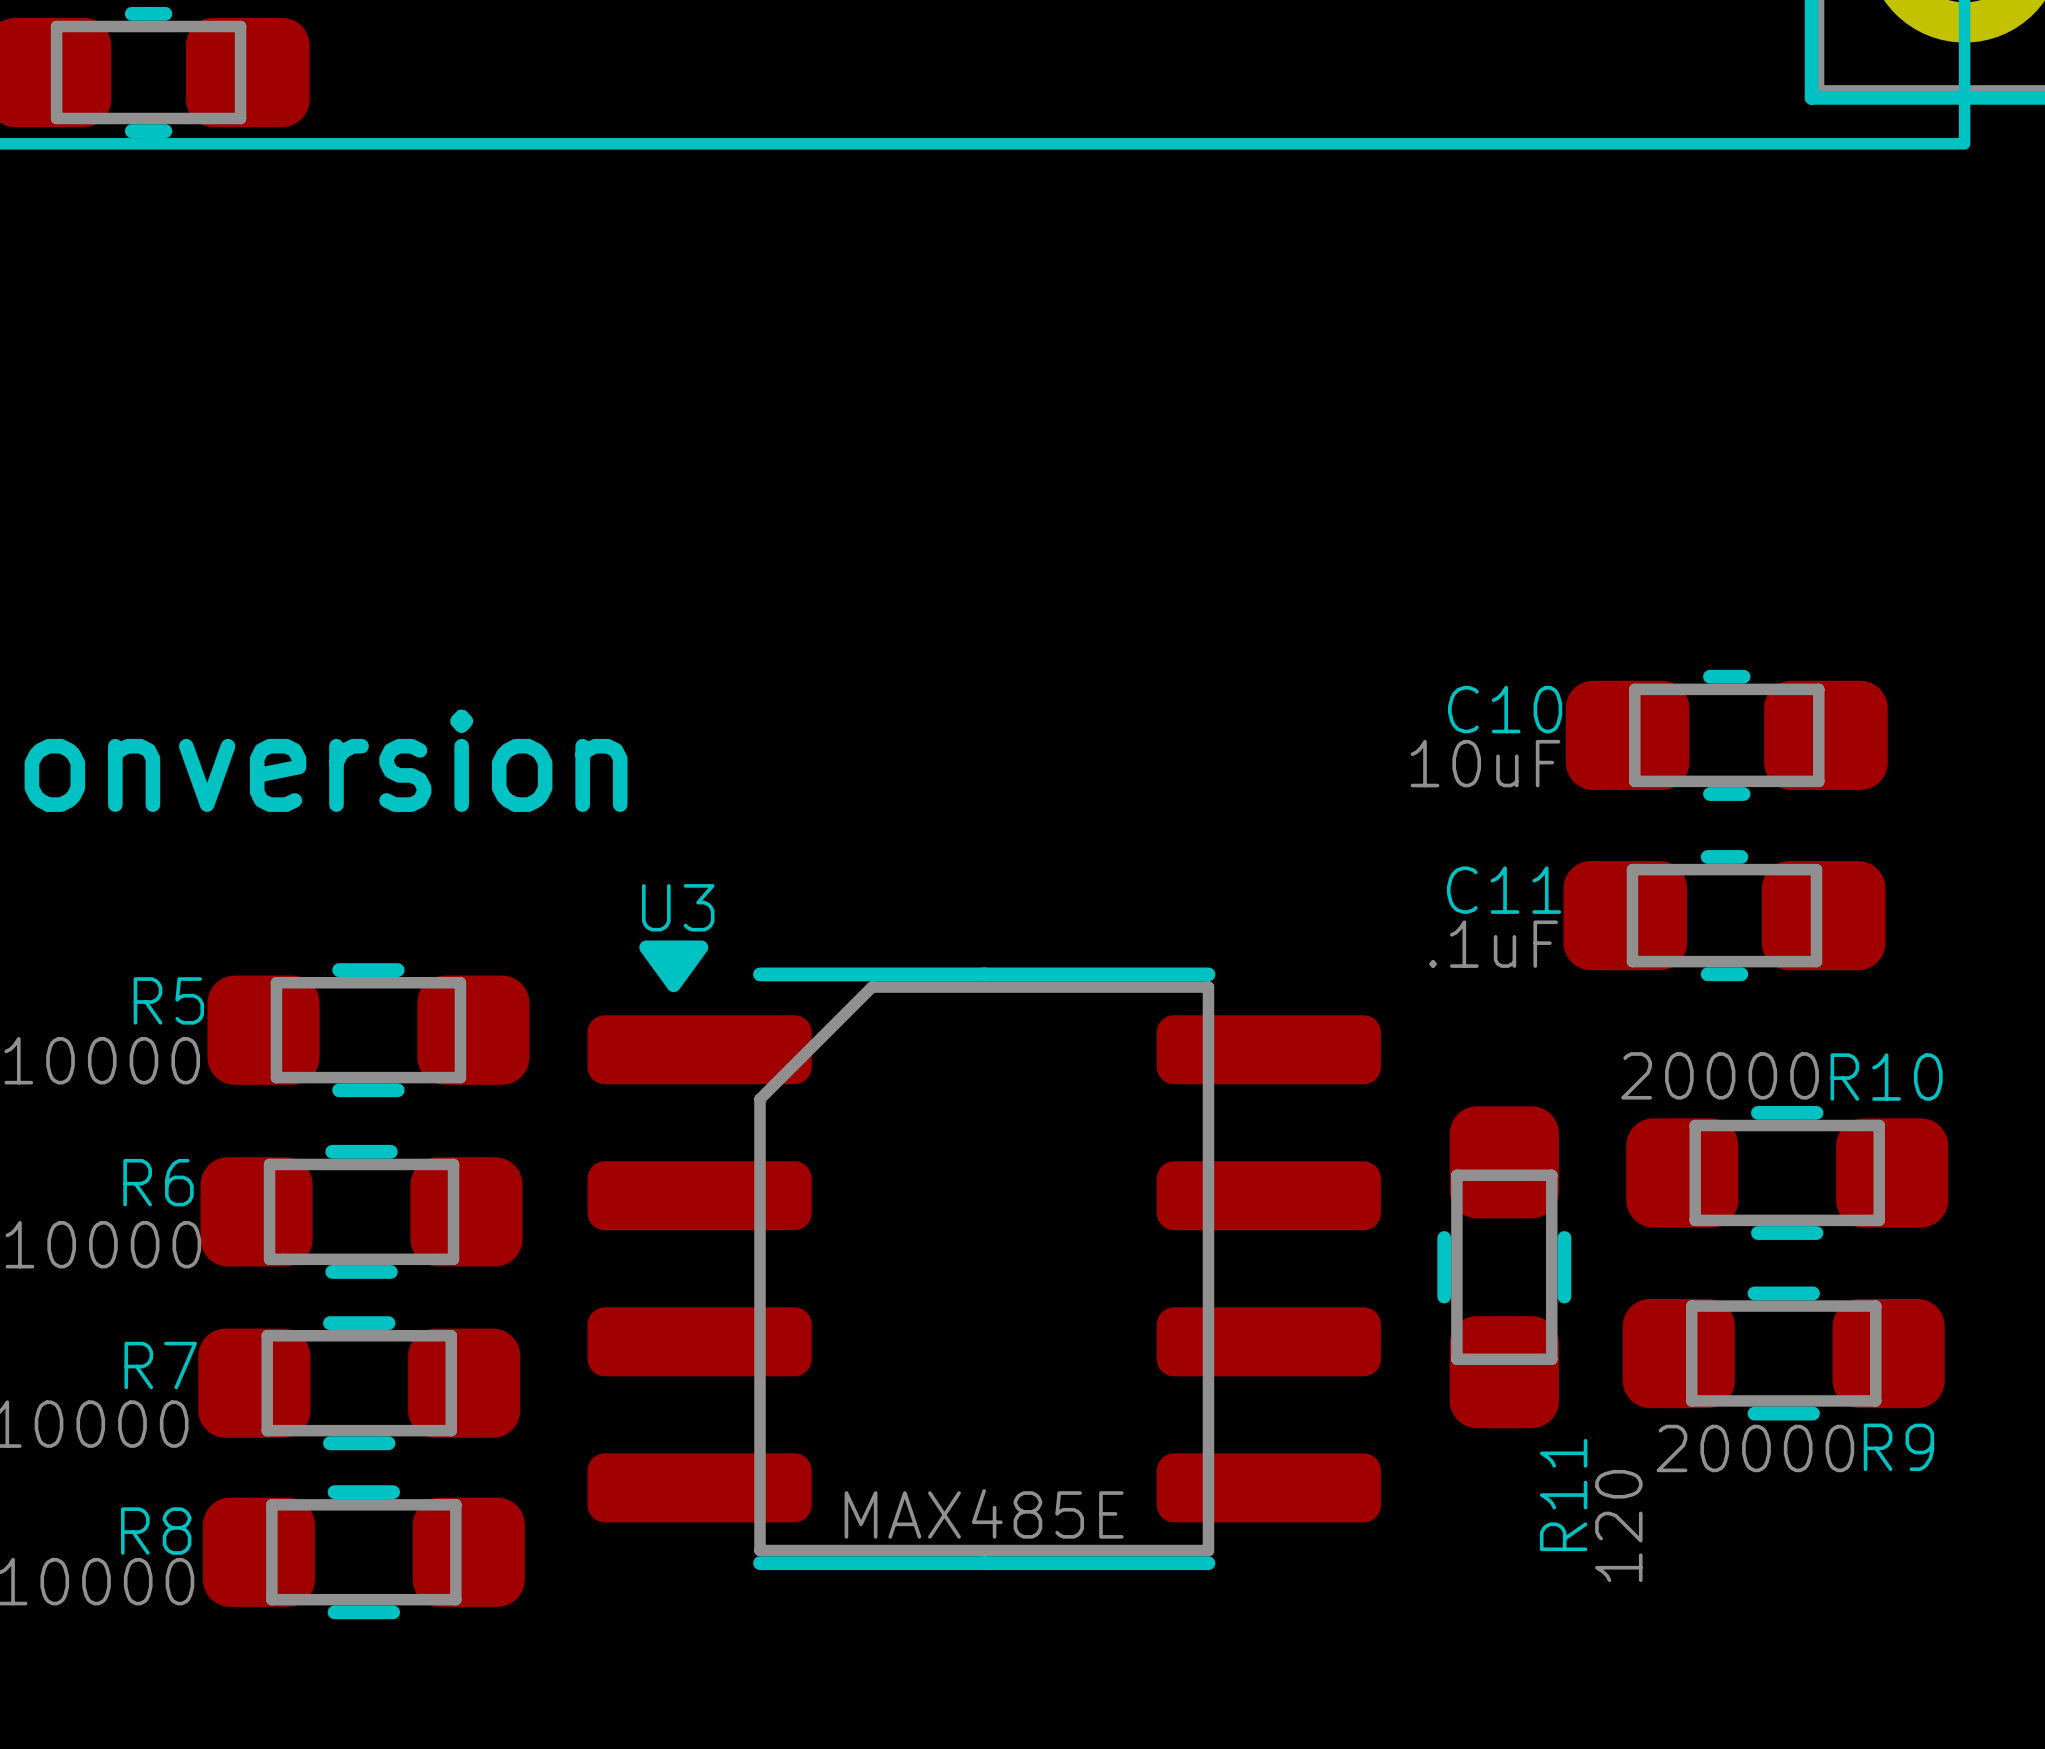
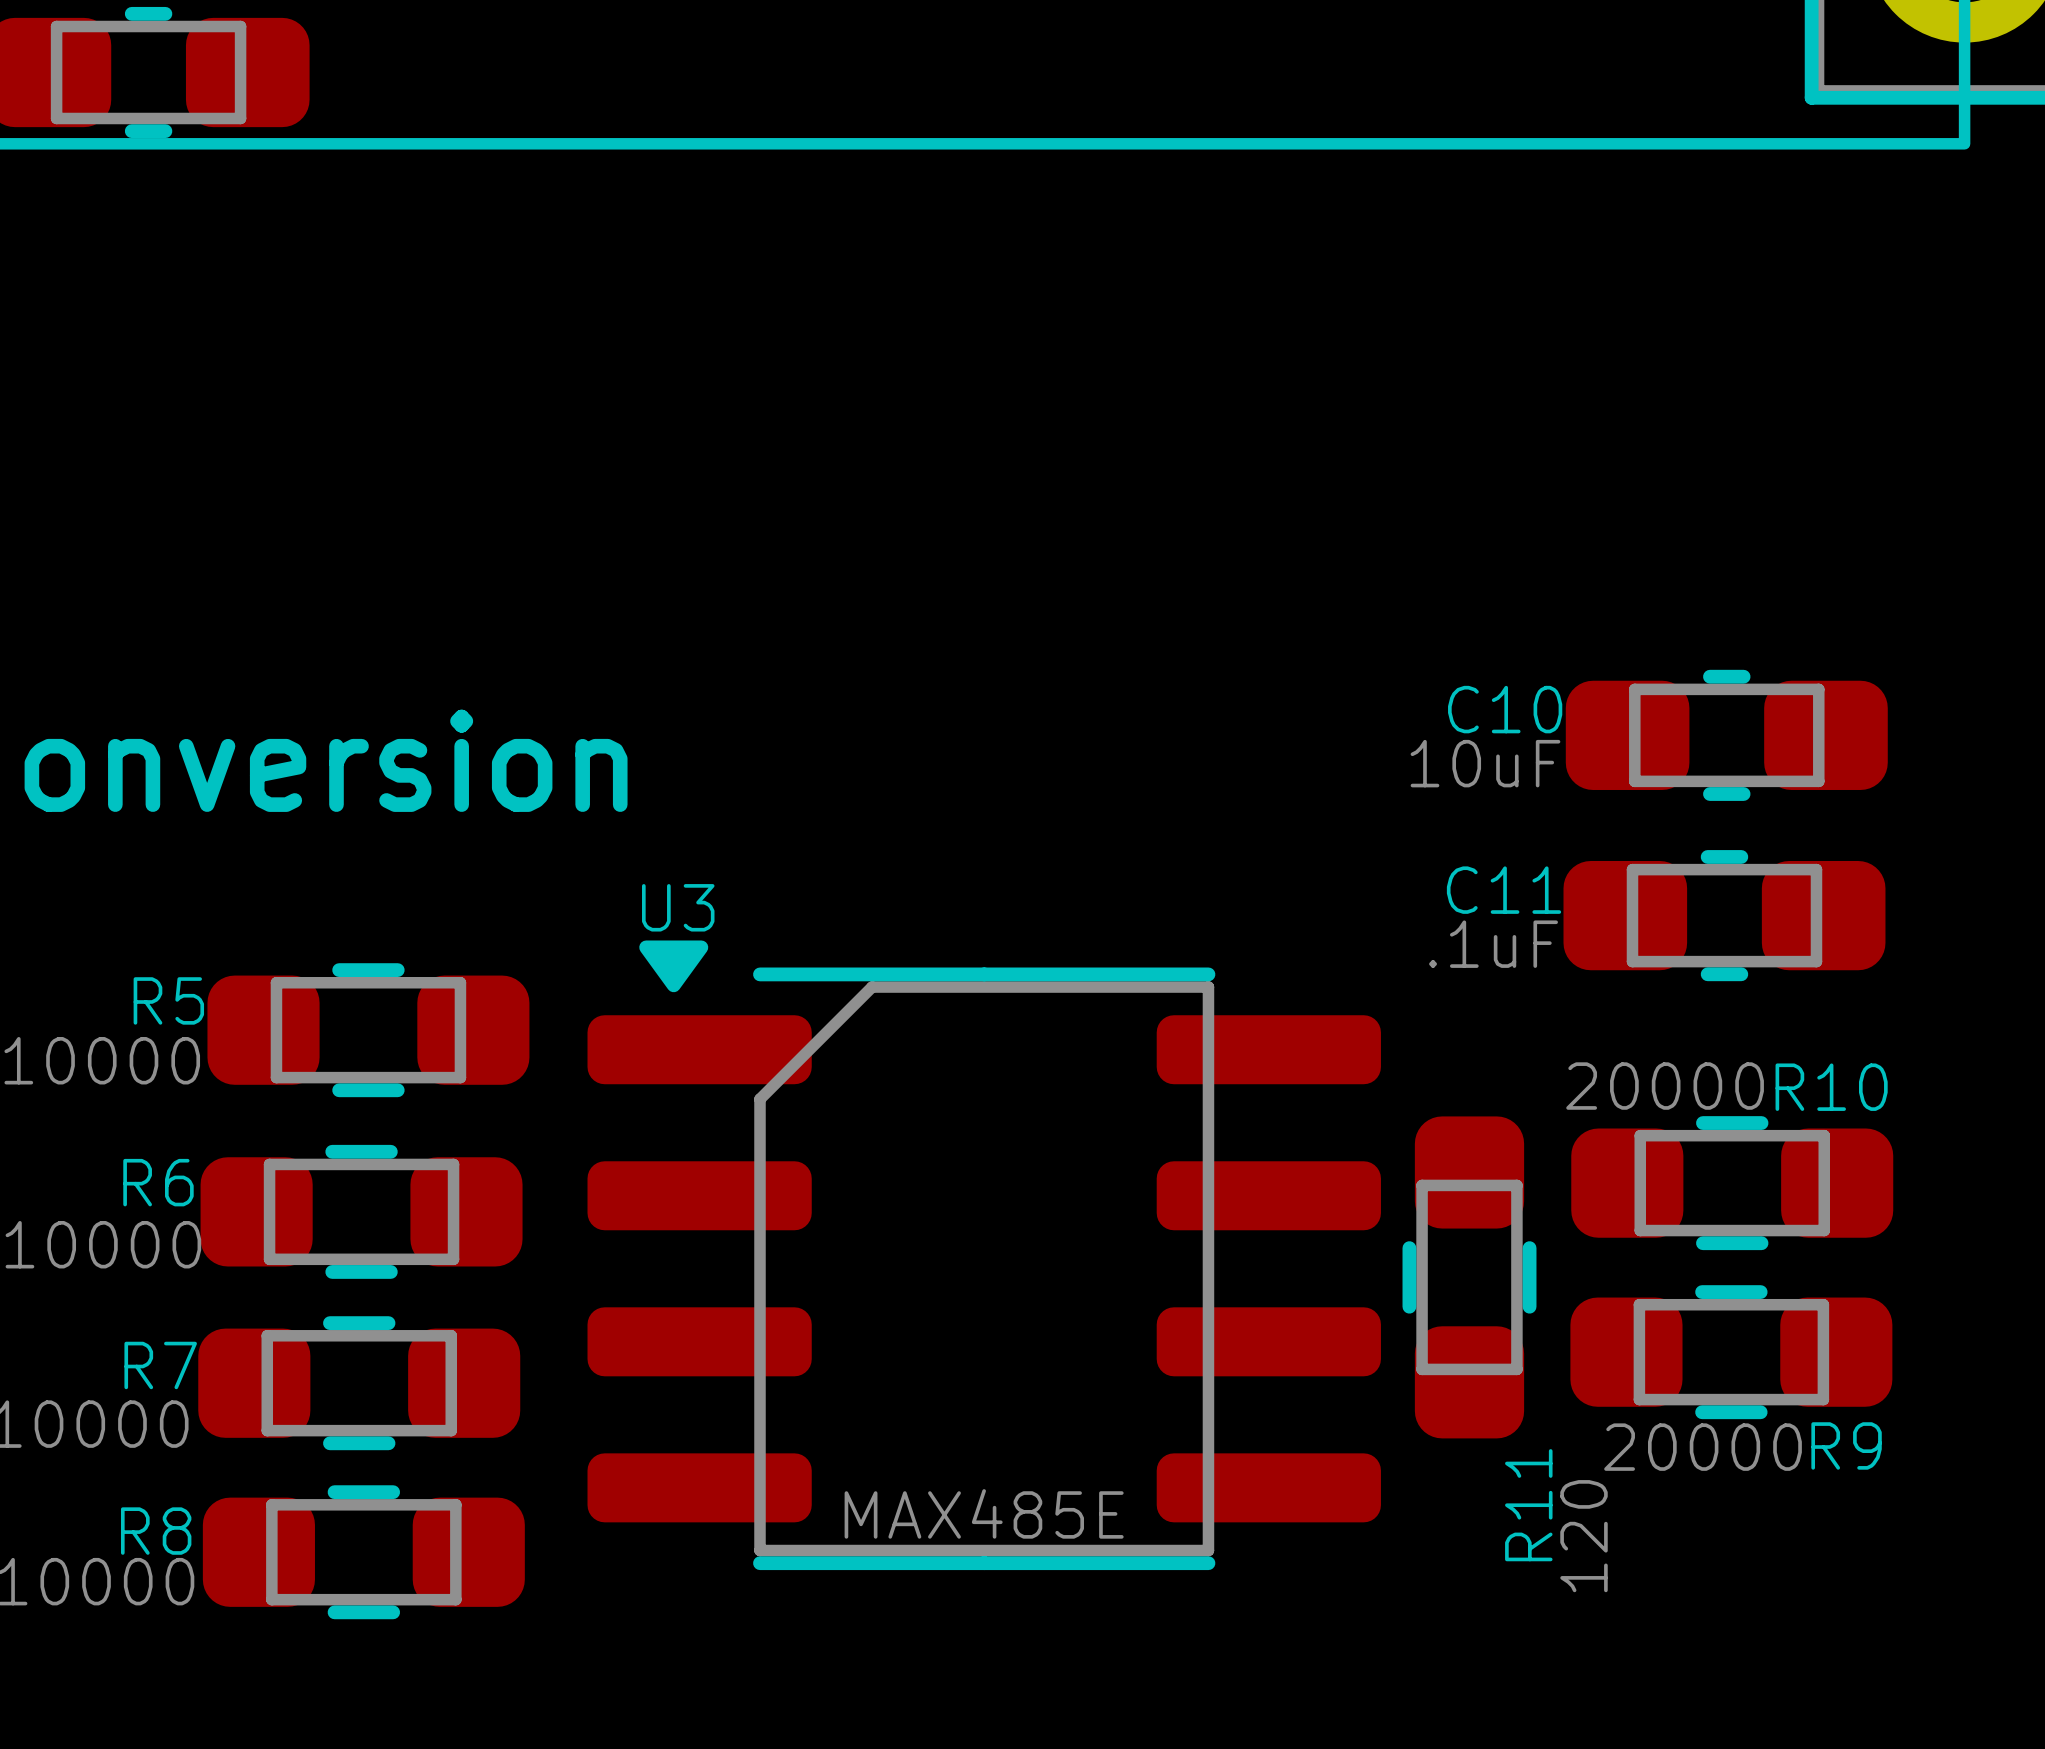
R10 position: (1787, 1172) -> (1732, 1183)
R11 position: (1504, 1267) -> (1469, 1277)
R9 position: (1783, 1353) -> (1731, 1352)

